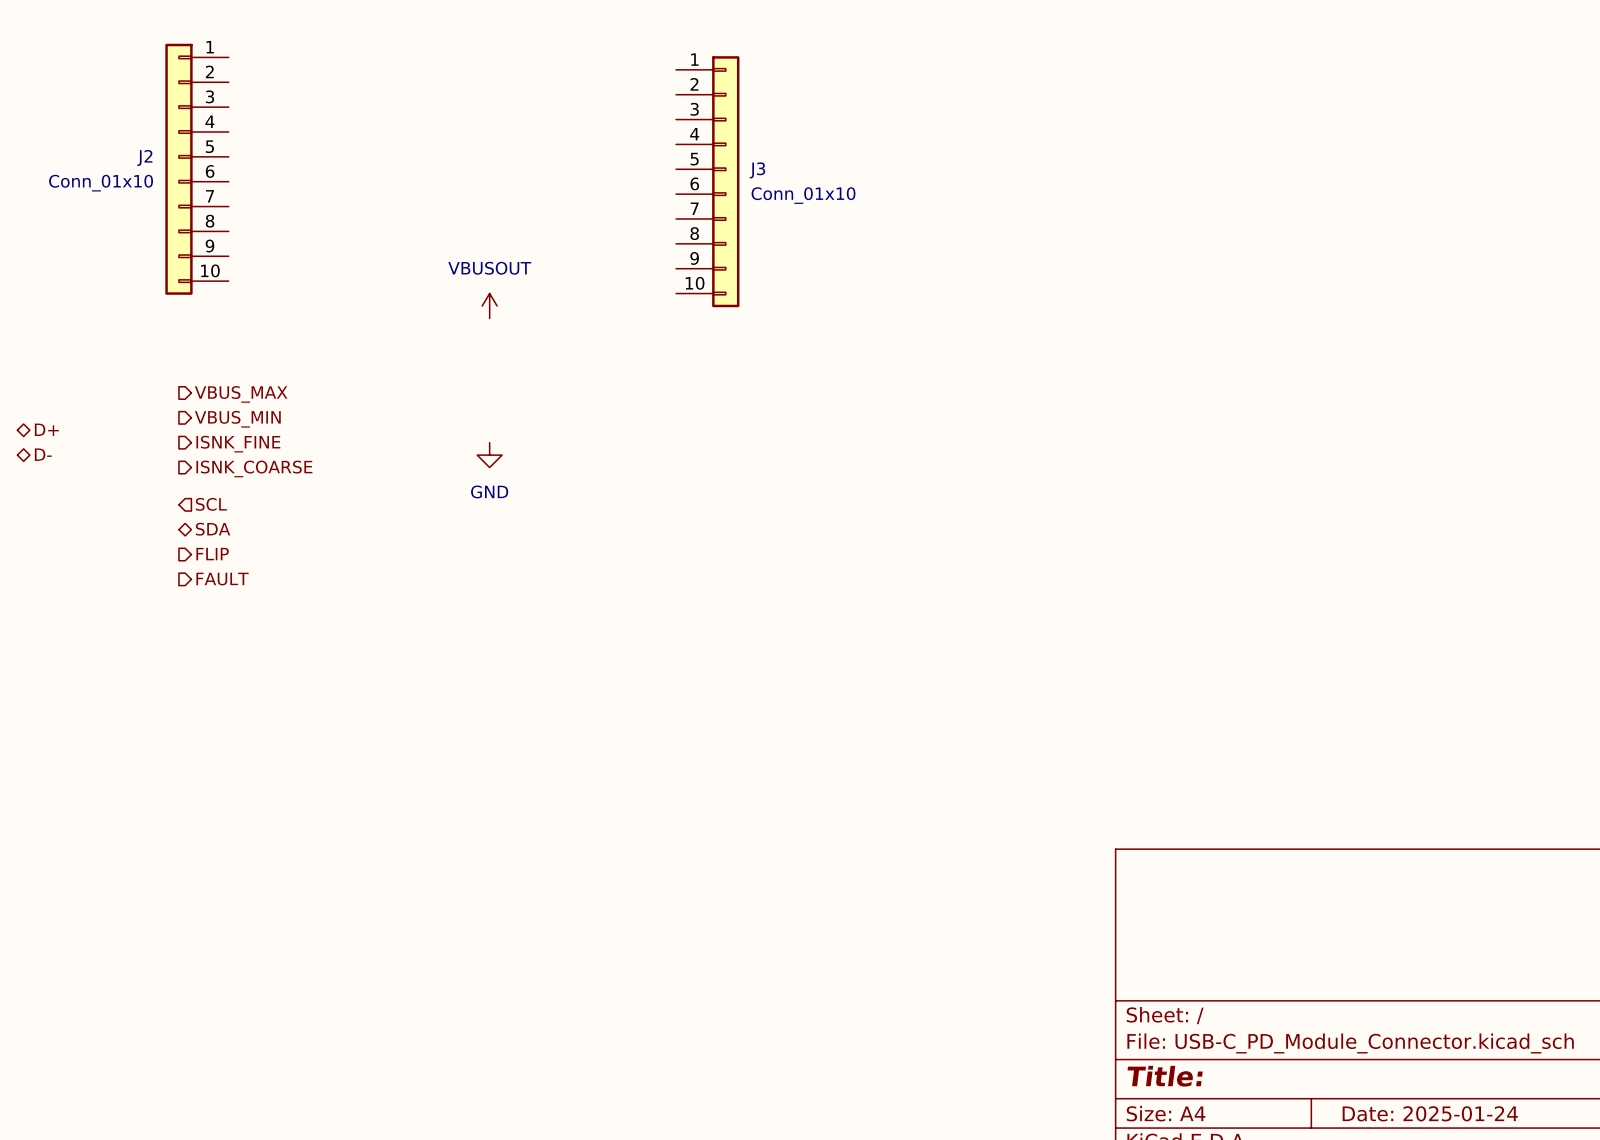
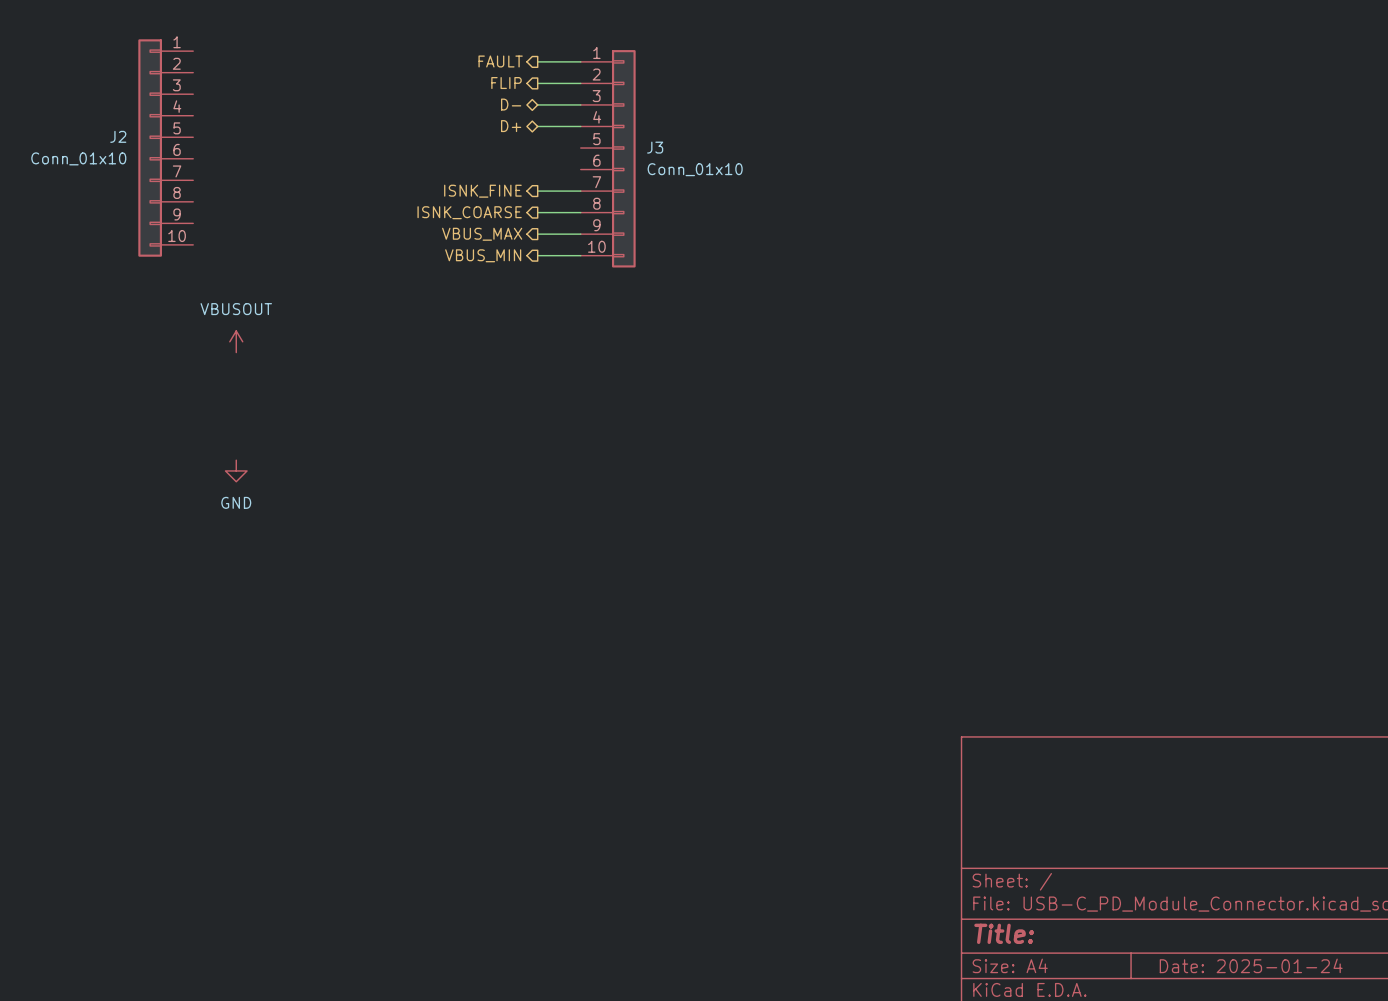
hierarchical label: none -> FAULT (500, 61)
wire: none -> (537, 61) (580, 61)
hierarchical label: none -> FLIP (506, 83)
wire: none -> (537, 83) (580, 83)
hierarchical label: none -> D- (511, 104)
wire: none -> (537, 104) (580, 104)
hierarchical label: none -> D+ (511, 126)
wire: none -> (537, 126) (580, 126)
wire: none -> (537, 191) (580, 191)
hierarchical label: none -> ISNK_FINE (482, 191)
wire: none -> (537, 212) (580, 212)
hierarchical label: none -> ISNK_COARSE (469, 212)
wire: none -> (537, 234) (580, 234)
hierarchical label: none -> VBUS_MAX (482, 234)
wire: none -> (537, 255) (580, 255)
hierarchical label: none -> VBUS_MIN (483, 255)
power symbol position: VBUSOUT (489, 305) -> VBUSOUT (236, 341)
hierarchical label: VBUS_MAX (241, 394) -> none
hierarchical label: VBUS_MIN (237, 419) -> none
hierarchical label: D+ (46, 429) -> none
hierarchical label: ISNK_FINE (238, 444) -> none
hierarchical label: D- (43, 454) -> none
power symbol position: GND (489, 455) -> GND (236, 470)
hierarchical label: ISNK_COARSE (254, 468) -> none
hierarchical label: SCL (211, 504) -> none
hierarchical label: SDA (213, 529) -> none
hierarchical label: FLIP (212, 554) -> none
hierarchical label: FAULT (222, 579) -> none

